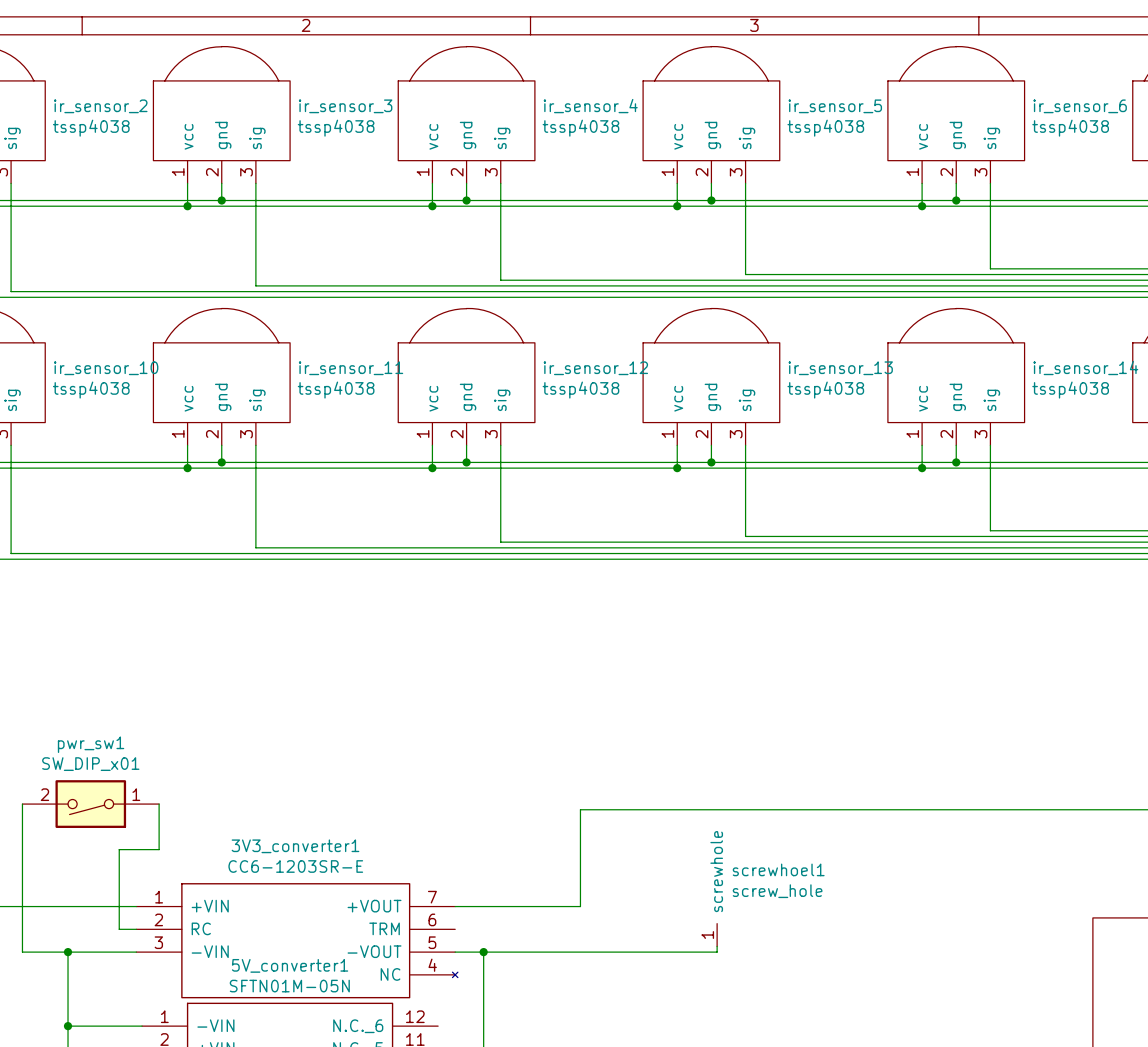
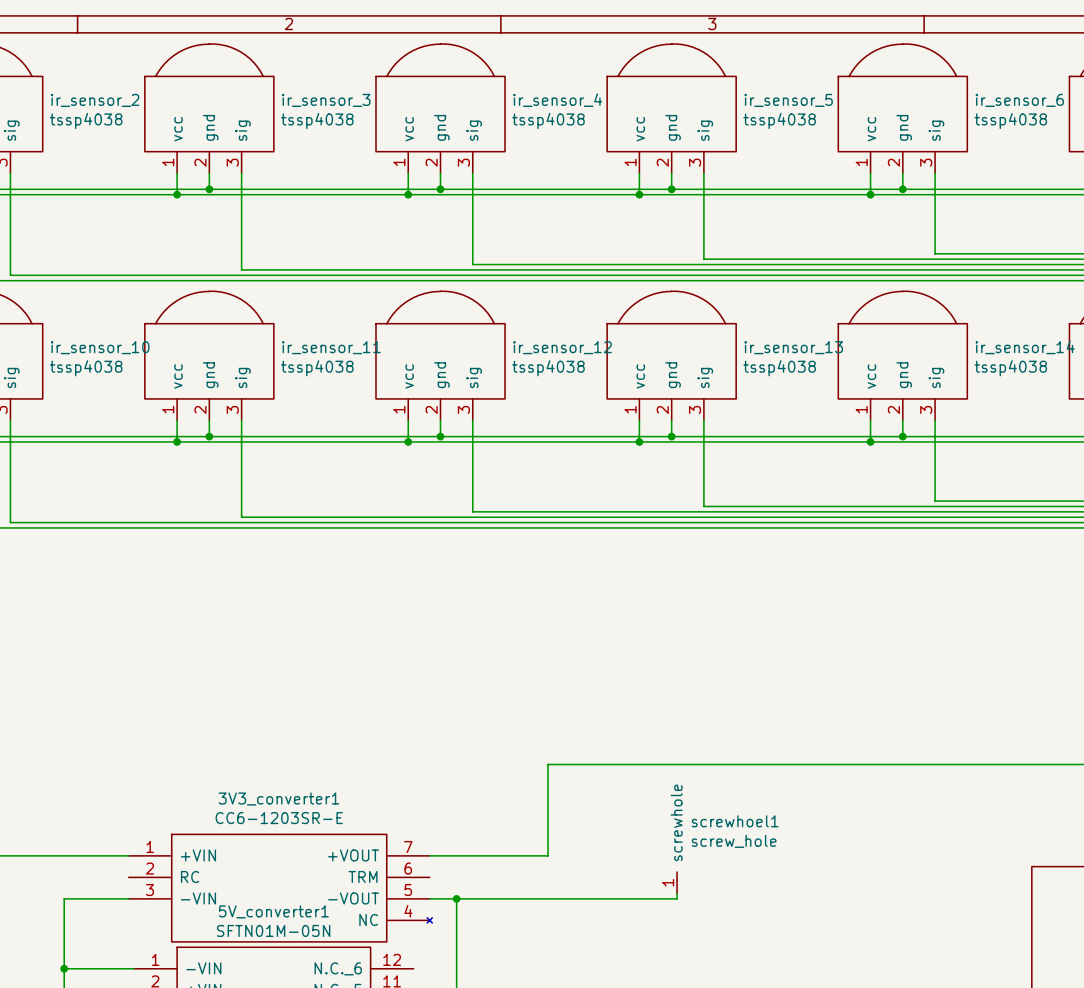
wire: (22, 804) (22, 952) (68, 952) -> none
pwr_sw1: SW_DIP_x01 (90, 804) -> none
wire: (159, 804) (159, 849) (119, 849) (119, 929) (136, 929) -> none
junction: (68, 952) -> none

